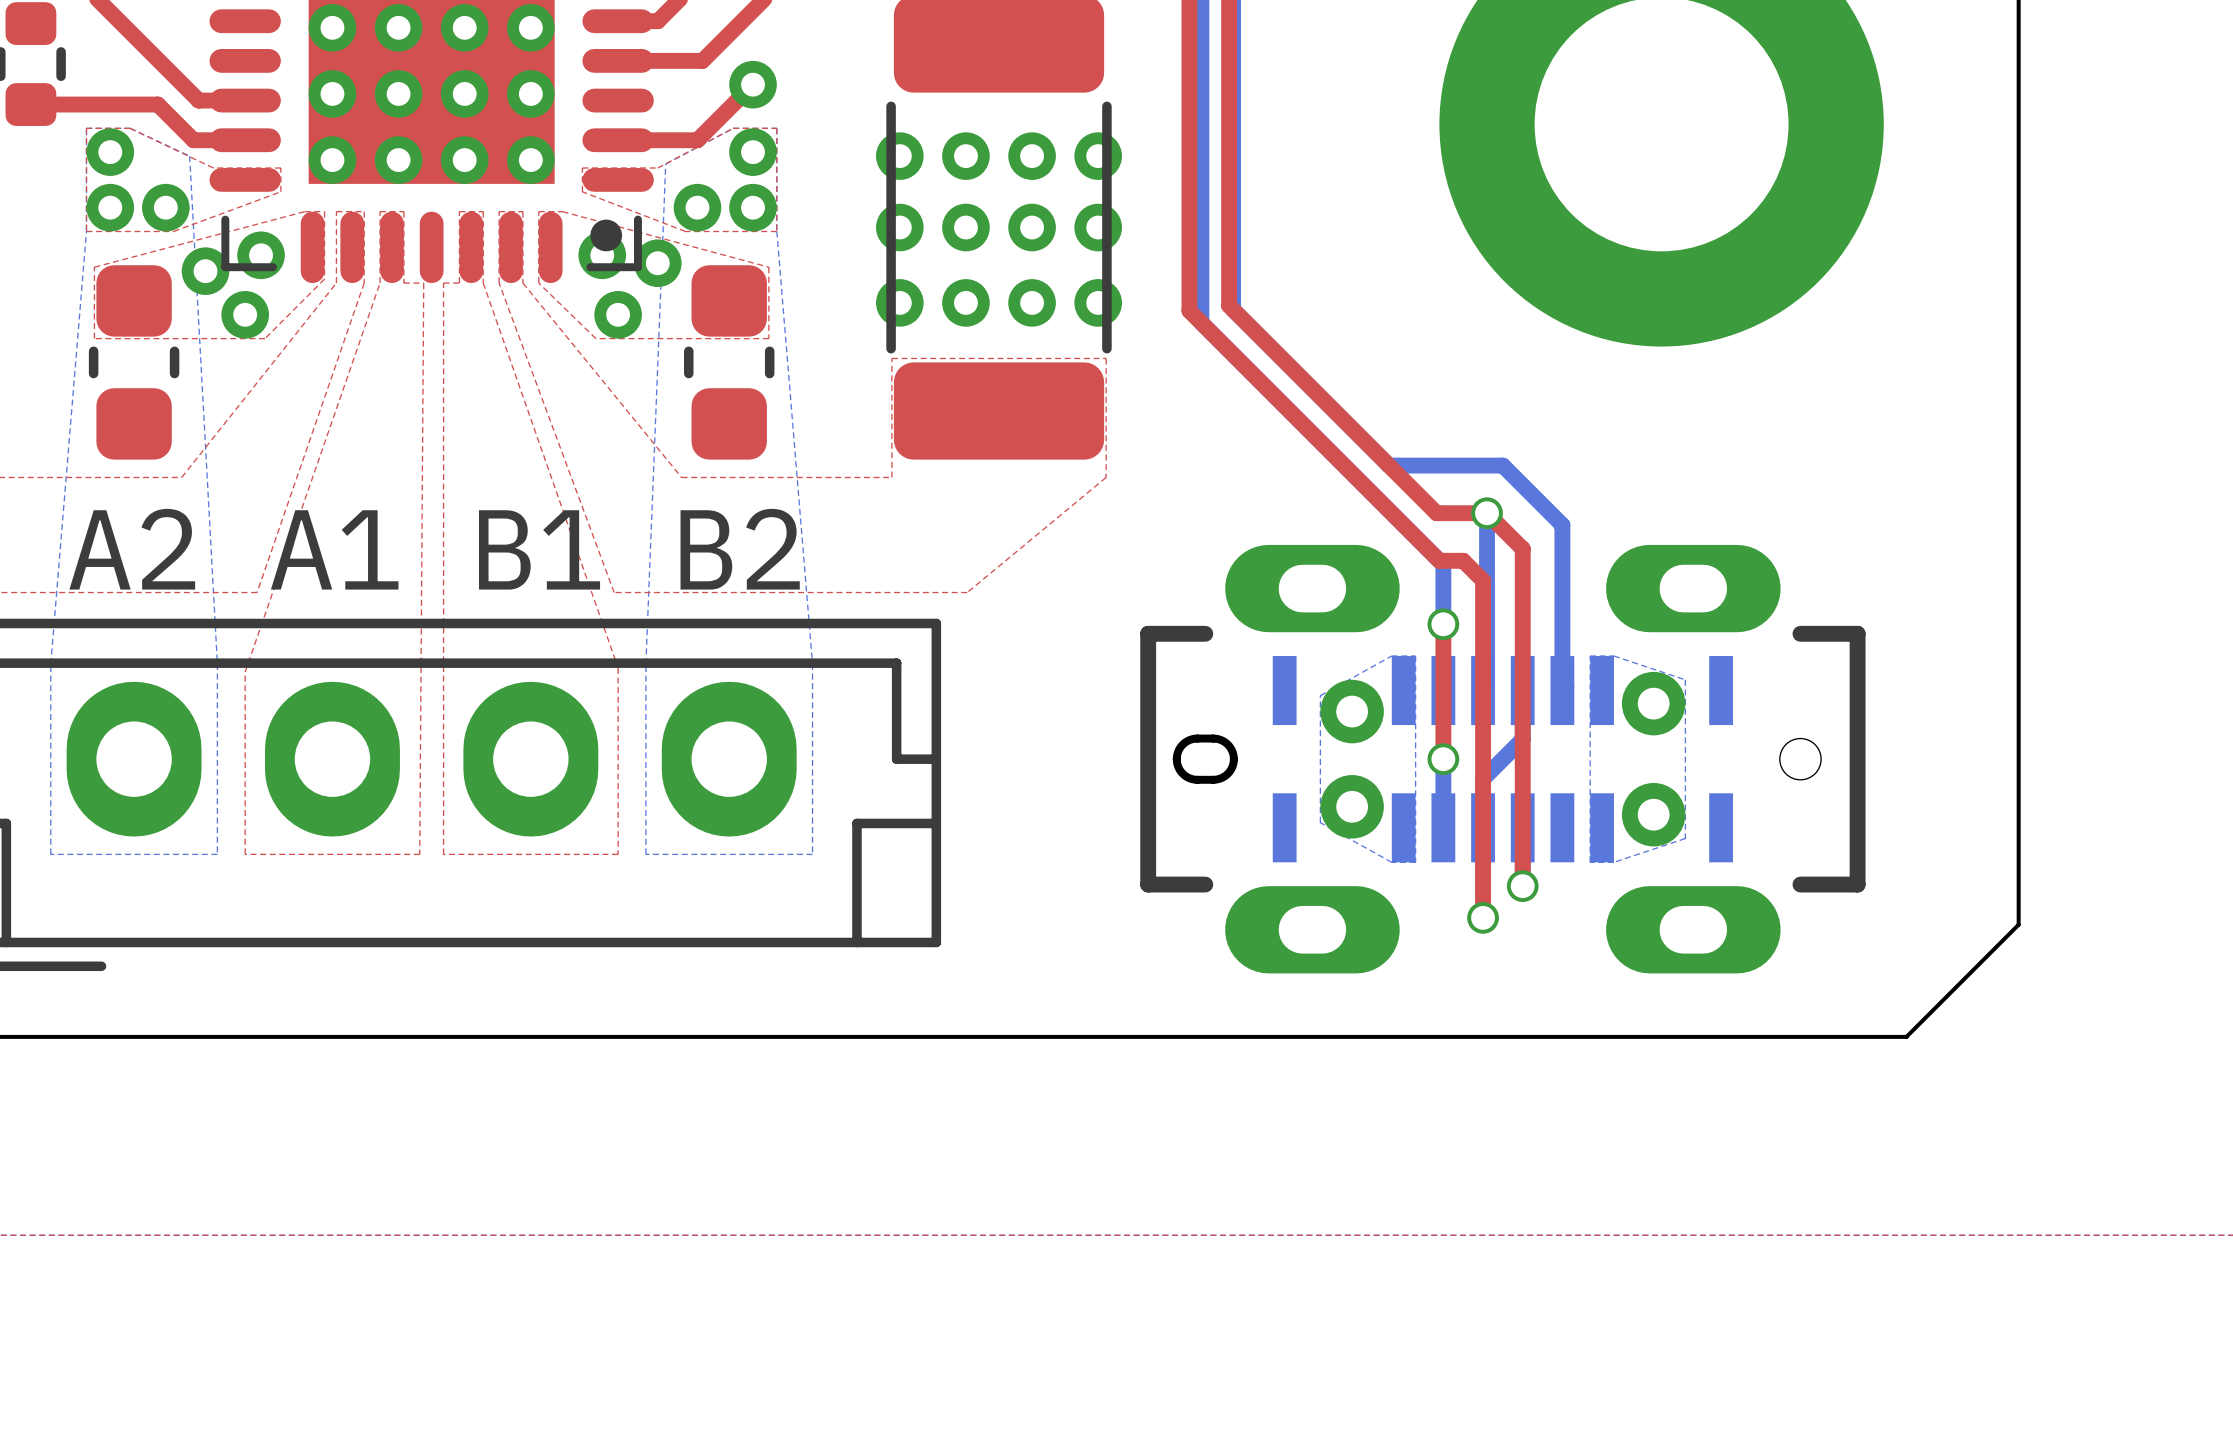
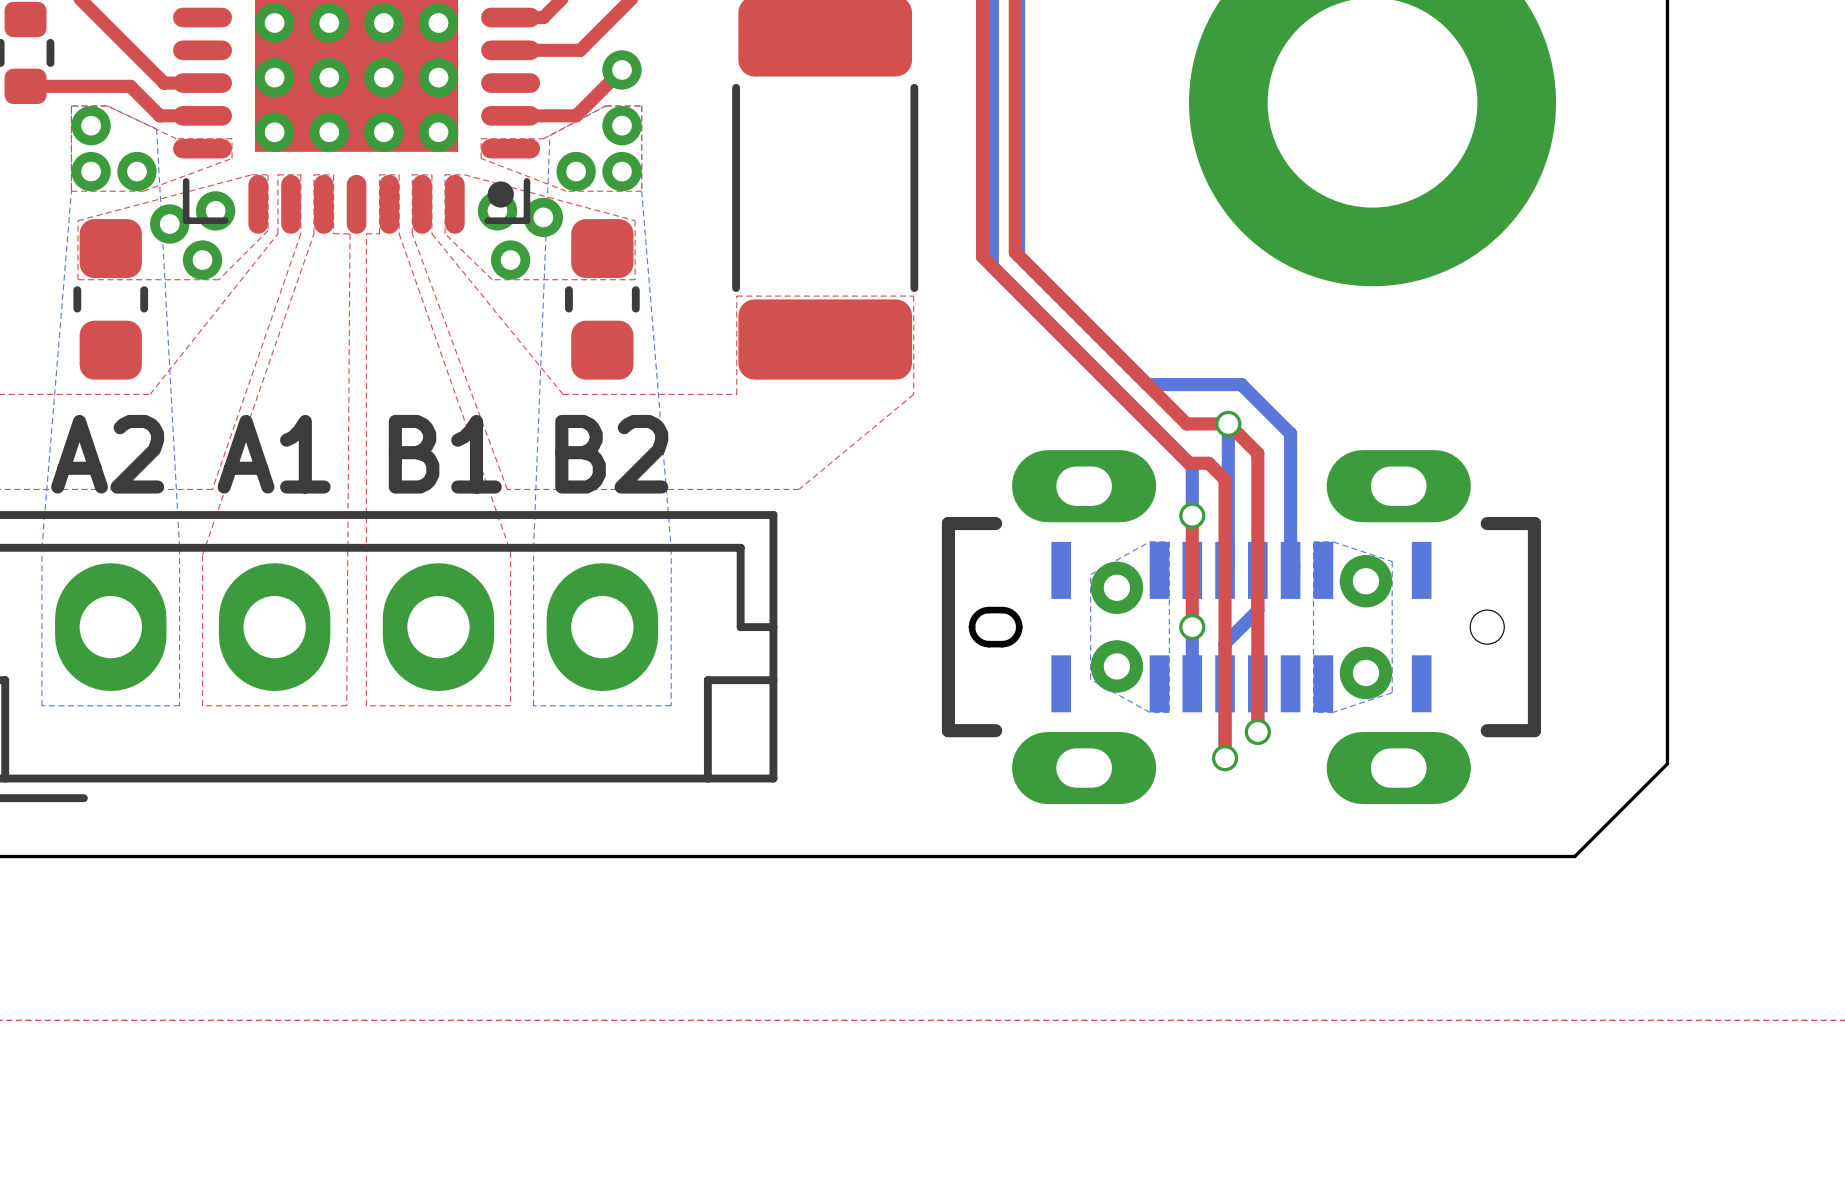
via: (899, 156) -> none
via: (965, 156) -> none
via: (1032, 156) -> none
via: (1098, 156) -> none
via: (899, 227) -> none
via: (965, 227) -> none
via: (1032, 227) -> none
via: (1098, 227) -> none
via: (899, 302) -> none
via: (965, 302) -> none
via: (1032, 302) -> none
via: (1098, 302) -> none

